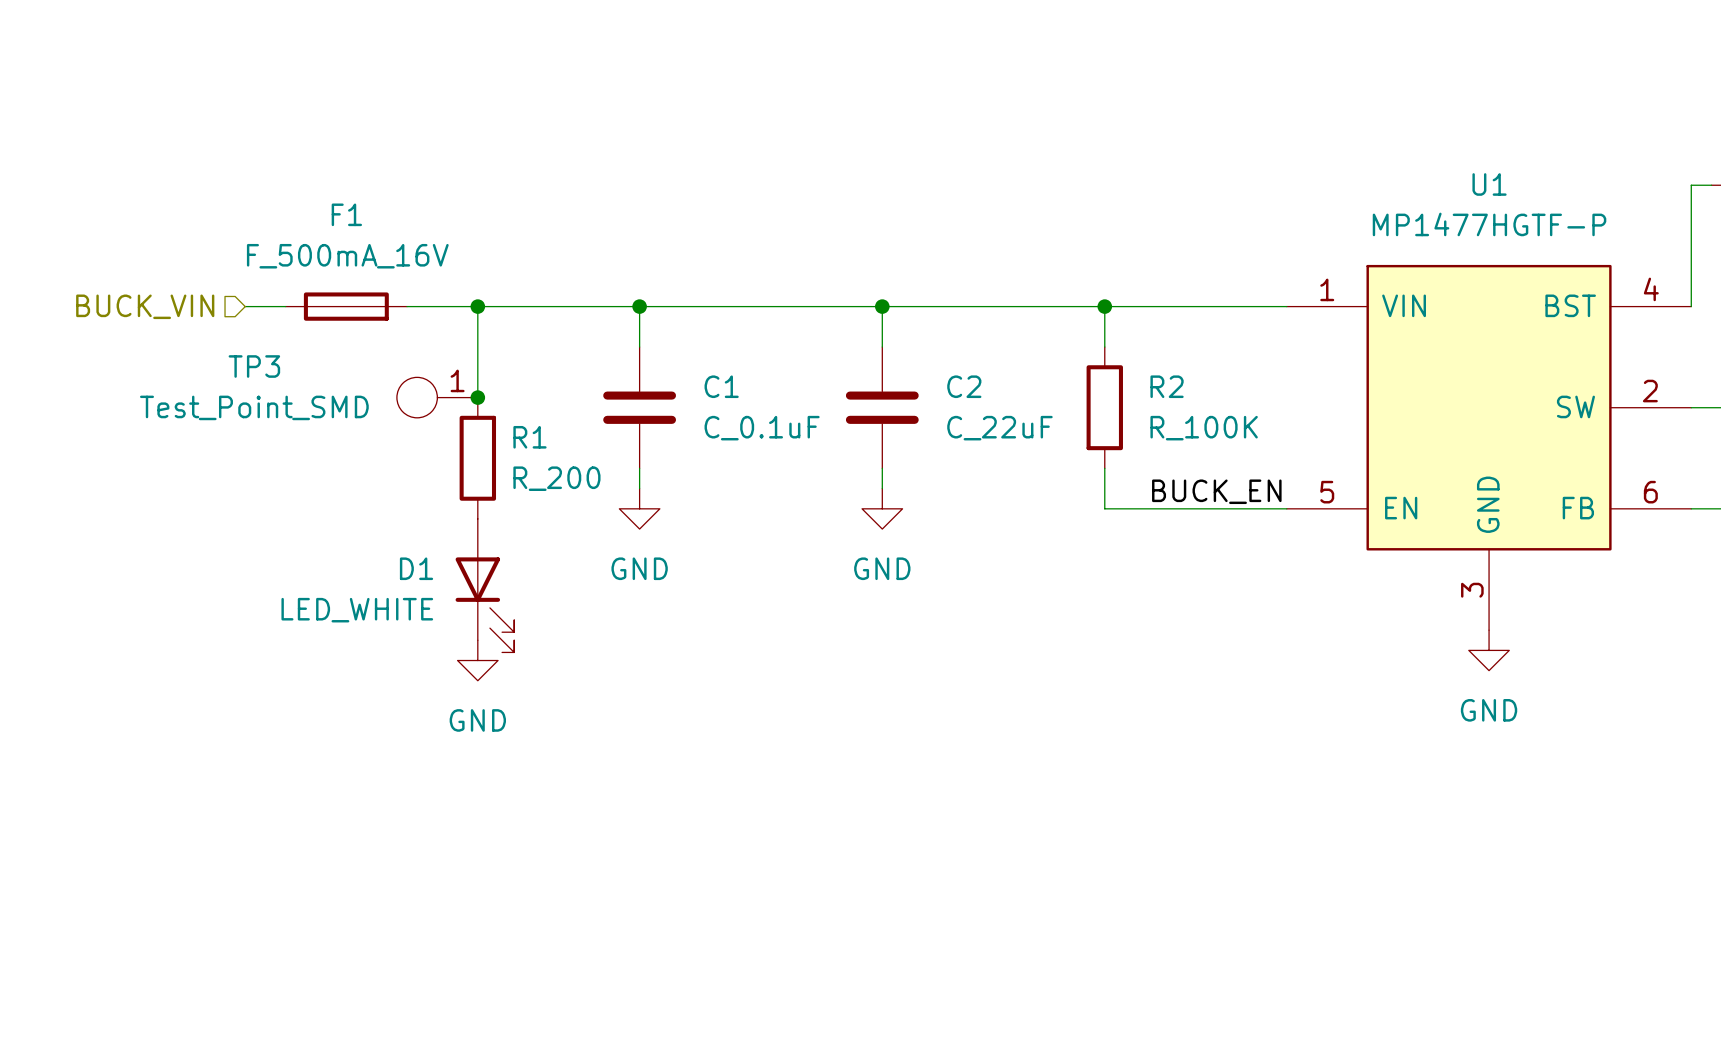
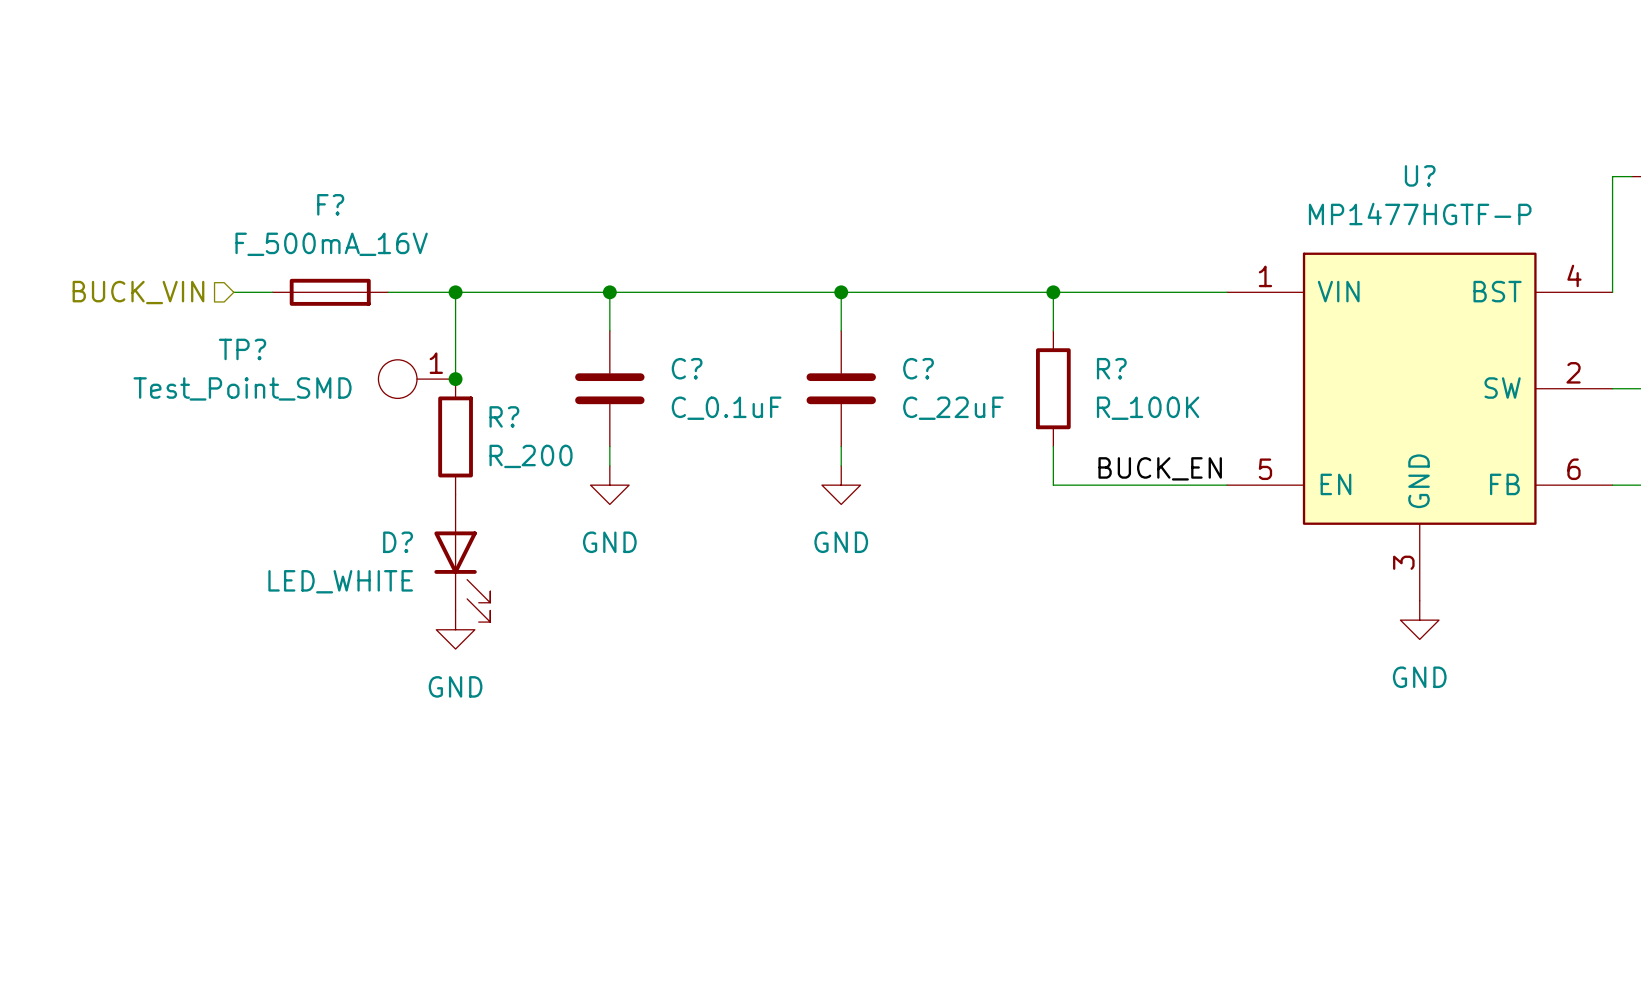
U1 name: U1 (1489, 184) -> U? (1420, 175)
F1 name: F1 (346, 214) -> F? (330, 204)
TP3 name: TP3 (254, 366) -> TP? (242, 349)
C1 name: C1 (721, 386) -> C? (687, 368)
C2 name: C2 (964, 386) -> C? (918, 368)
R2 name: R2 (1167, 386) -> R? (1111, 368)
R1 name: R1 (529, 437) -> R? (504, 416)
D1 name: D1 (416, 568) -> D? (398, 542)

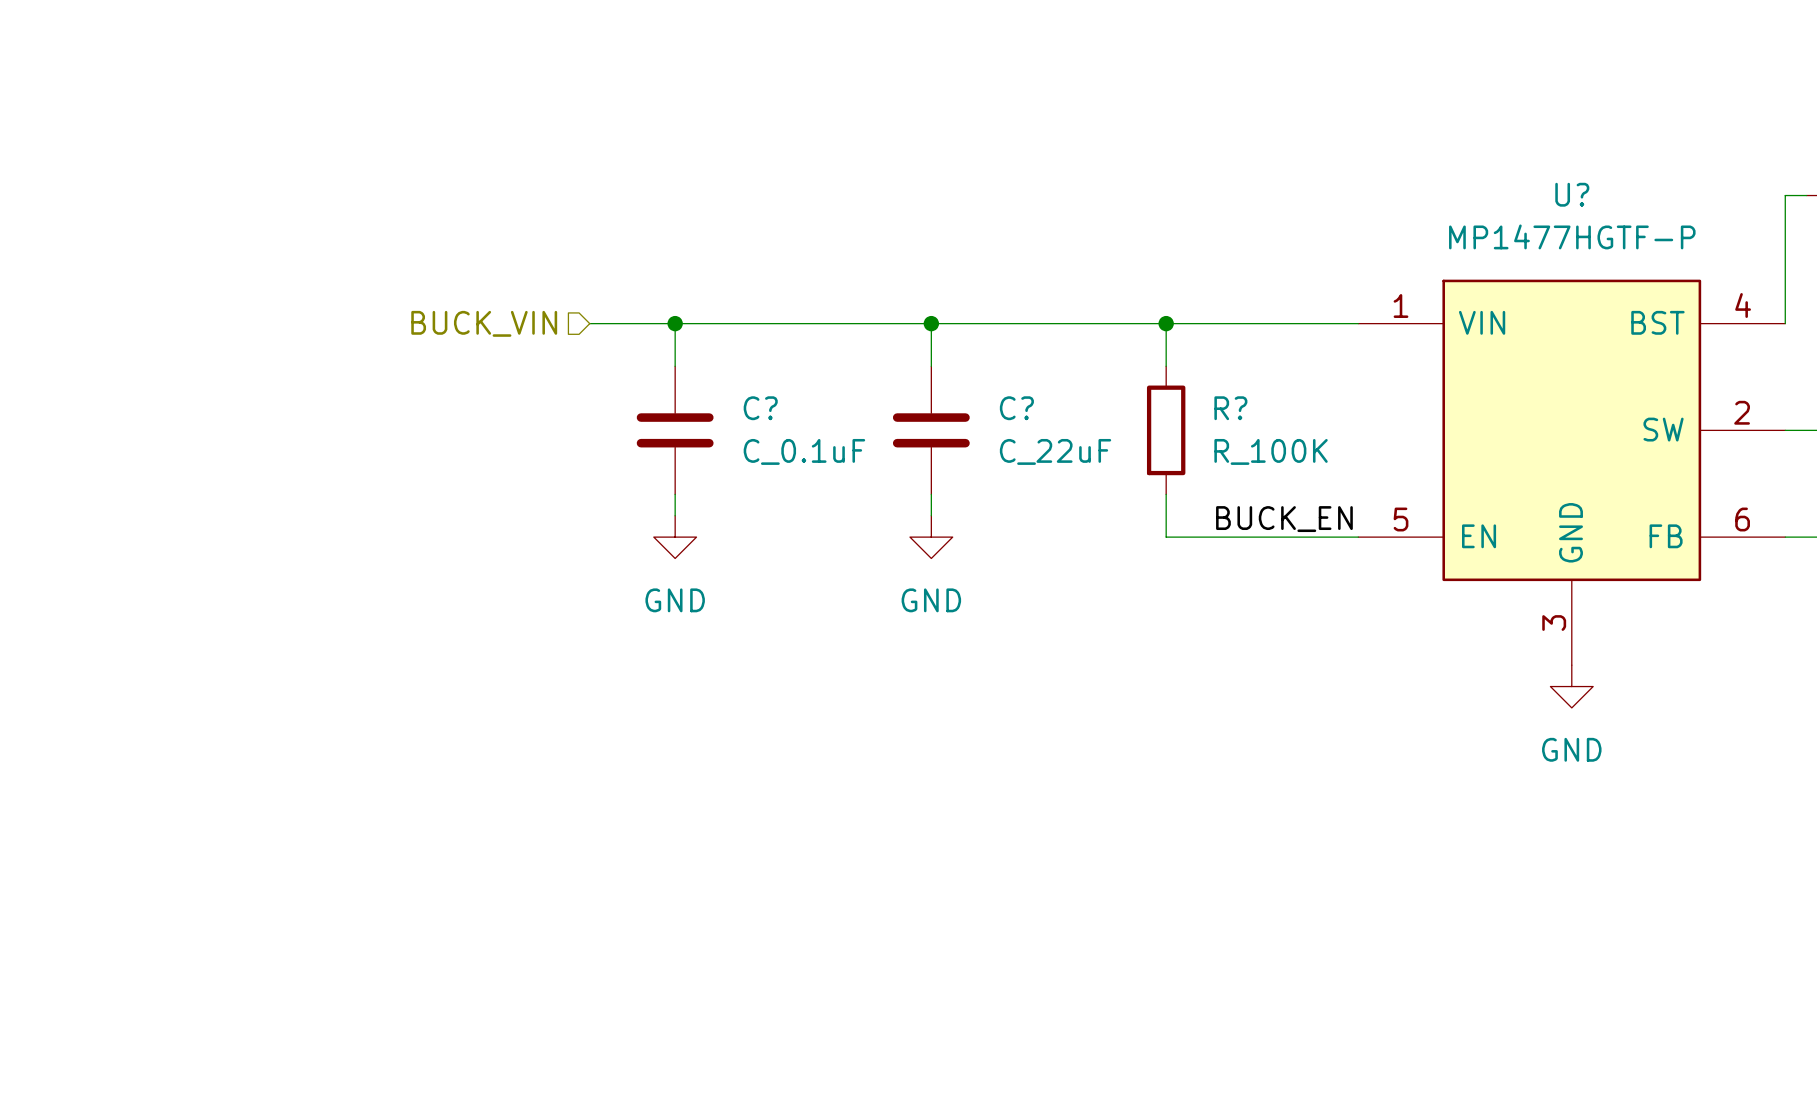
hierarchical label position: BUCK_VIN (138, 292) -> BUCK_VIN (484, 323)
wire: (233, 292) (272, 292) -> none
F?: F_500mA_16V (330, 292) -> none
wire: (388, 292) (532, 292) -> none
wire: (455, 292) (455, 379) -> none
junction: (455, 292) -> none
TP?: Test_Point_SMD (417, 379) -> none
junction: (455, 379) -> none
R?: R_200 (455, 436) -> none
D?: LED_WHITE (462, 558) -> none
power symbol: GND (455, 629) -> none

